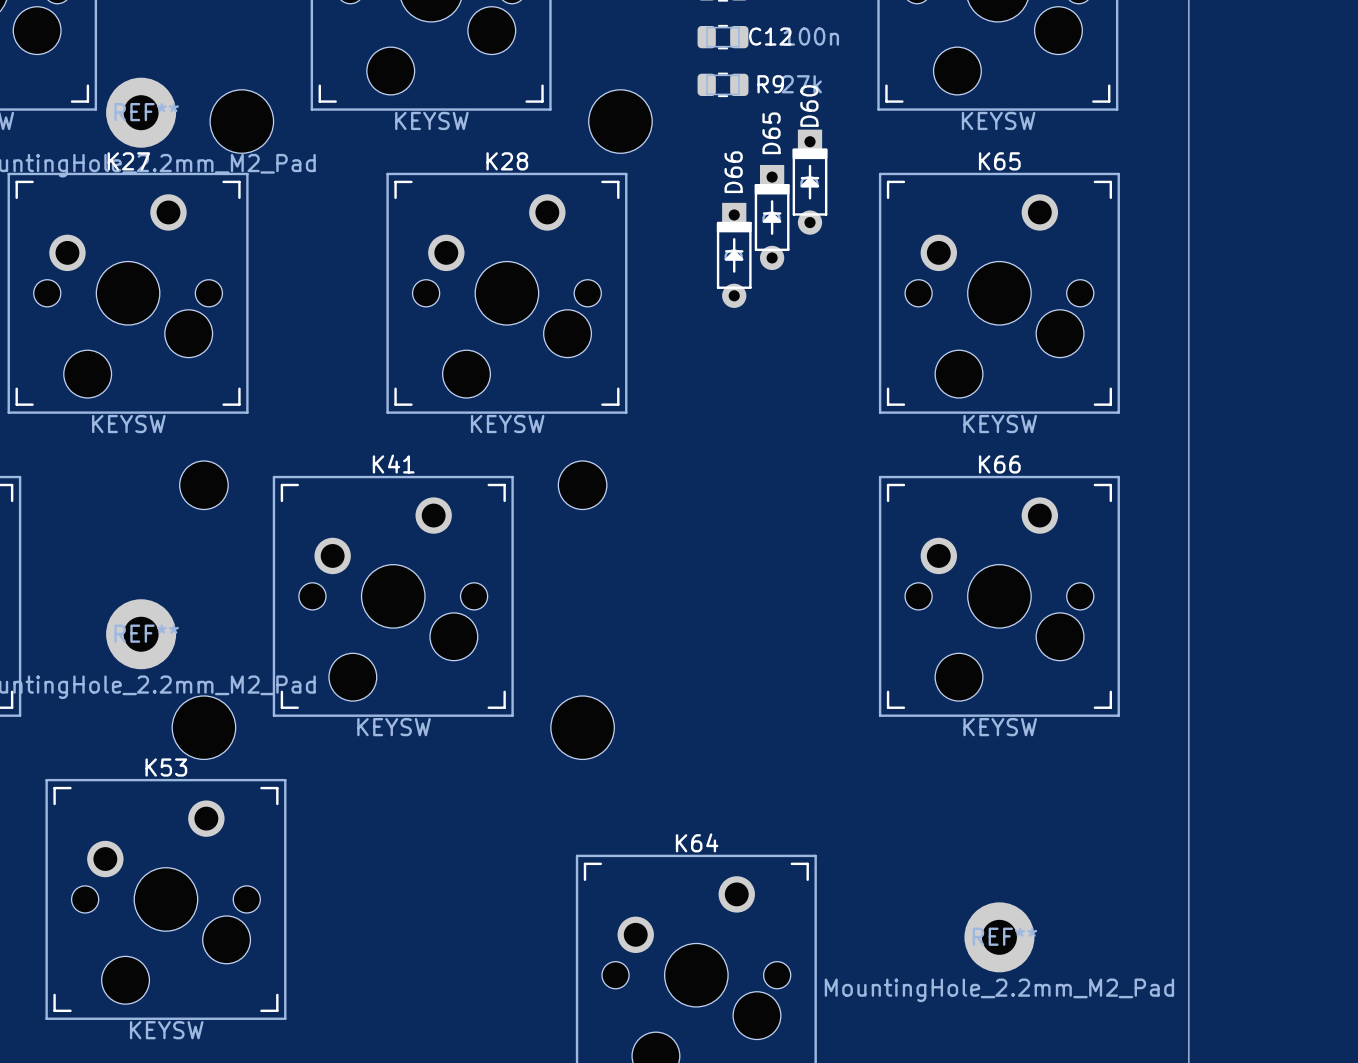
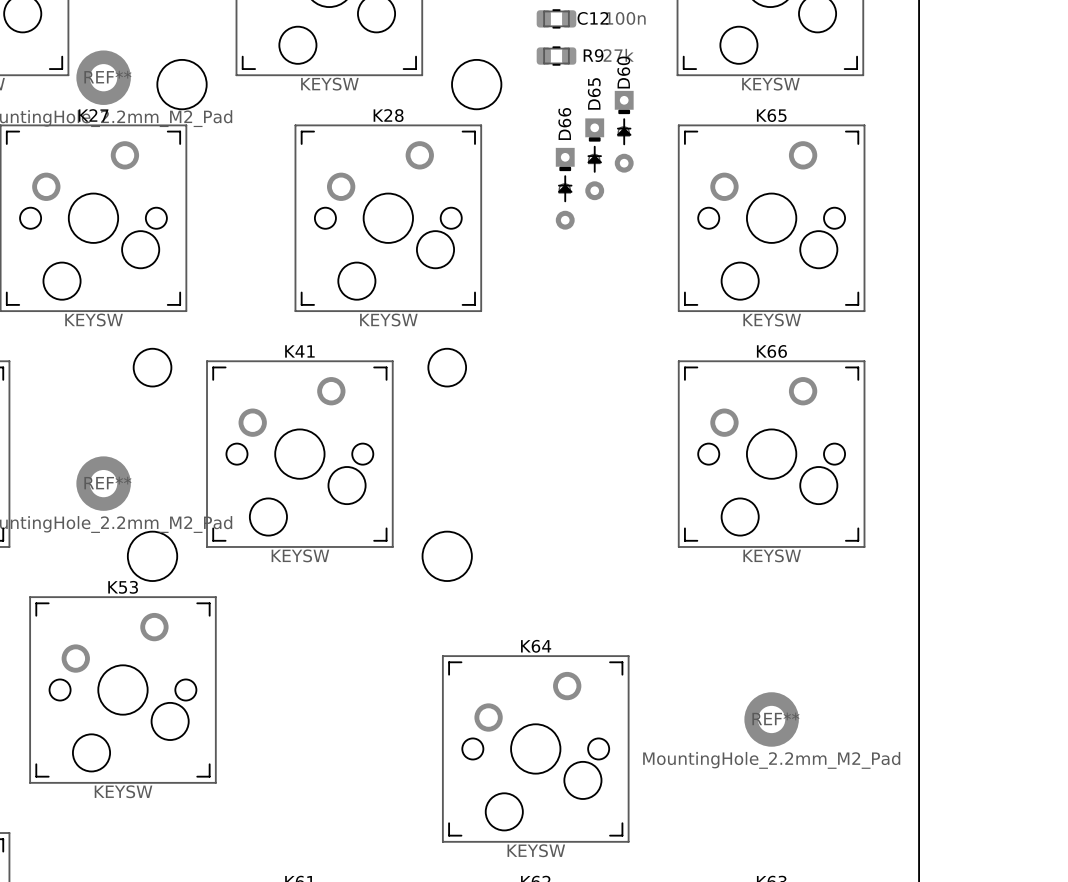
D60 footprint: [792, 129, 828, 235] -> [614, 90, 634, 173]
D65 footprint: [754, 164, 790, 271] -> [585, 118, 605, 201]
D66 footprint: [716, 202, 752, 308] -> [555, 147, 575, 230]

